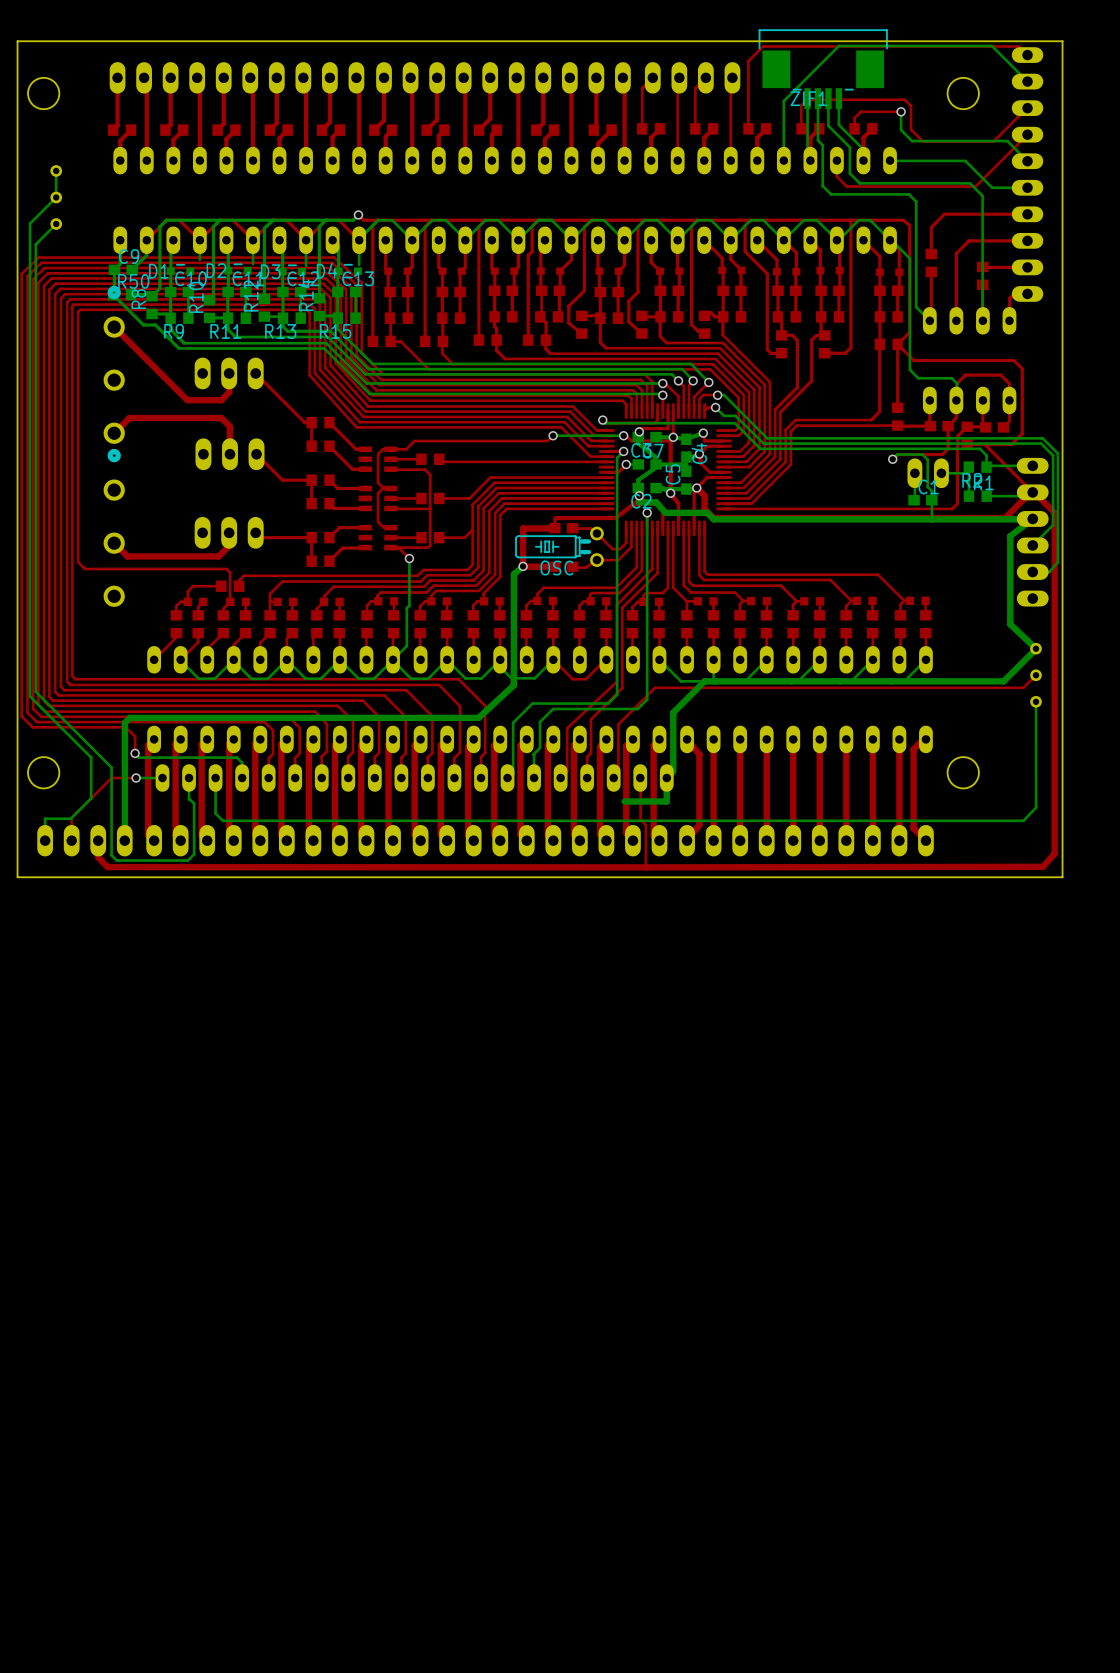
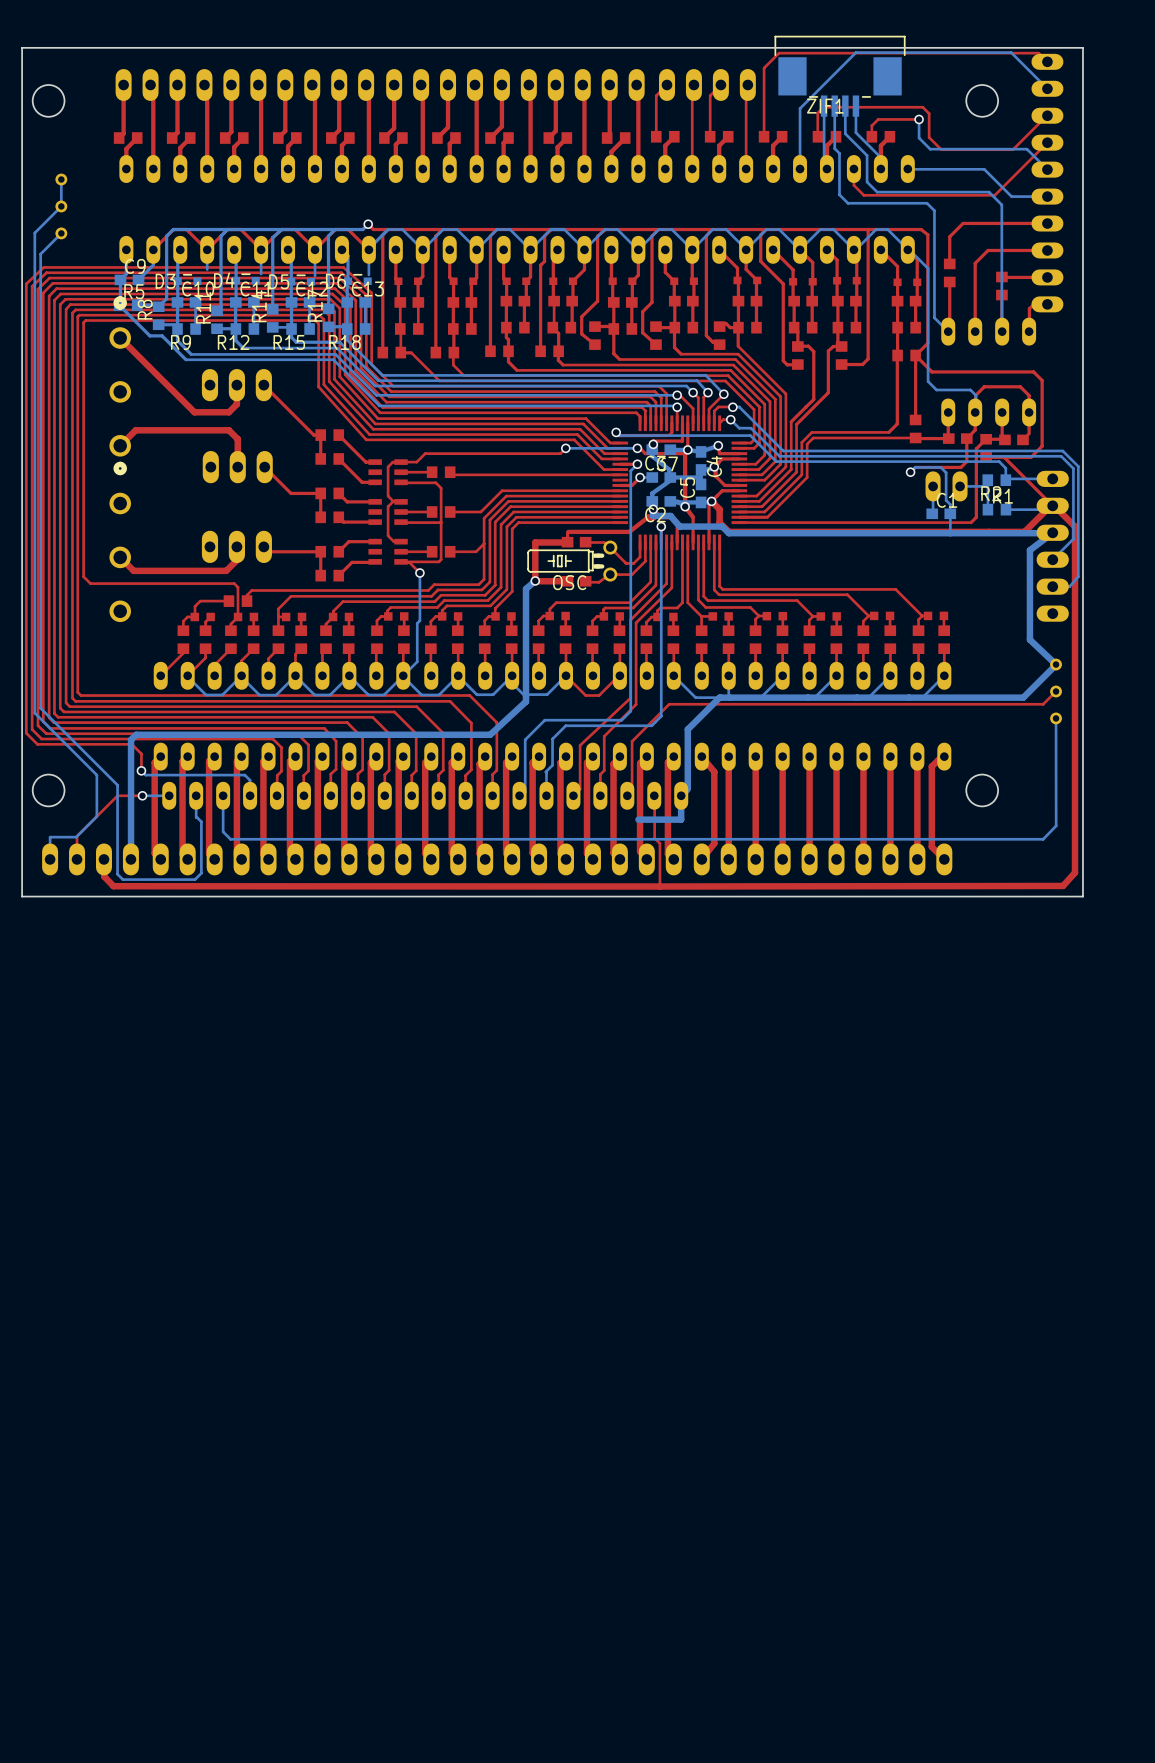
D2 name: D2 (216, 270) -> D4 (224, 280)
D4 name: D4 (326, 270) -> D6 (335, 281)
D1 name: D1 (158, 271) -> D3 (165, 281)
D3 name: D3 (270, 271) -> D5 (279, 281)
R50 name: R50 (133, 281) -> R5 (134, 291)
R14 name: R14 (305, 295) -> R17 (315, 305)
R12 name: R12 (251, 296) -> R14 (258, 306)
R10 name: R10 (196, 297) -> R11 (203, 307)
R11 name: R11 (225, 331) -> R12 (233, 342)
R13 name: R13 (280, 331) -> R15 (289, 342)
R15 name: R15 (335, 331) -> R18 (344, 342)

